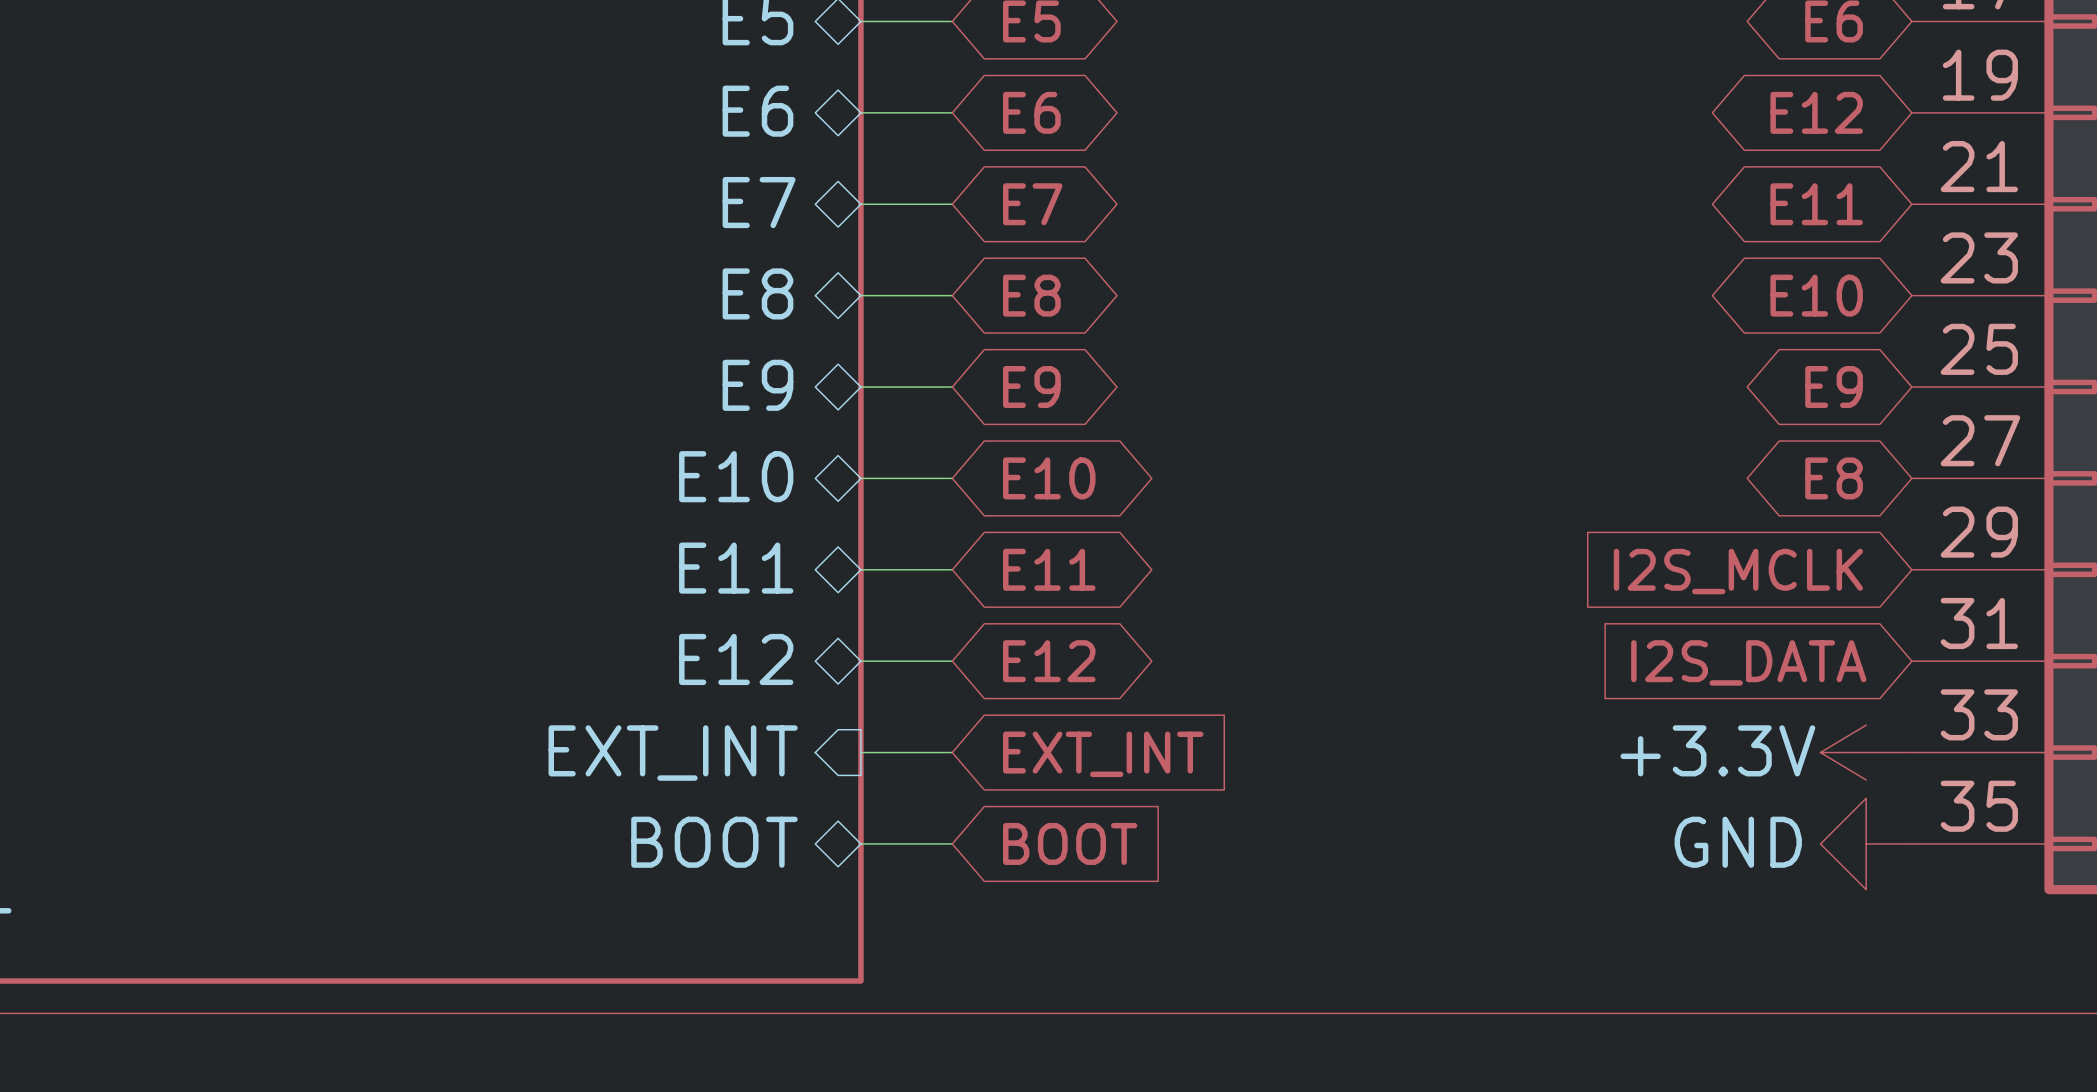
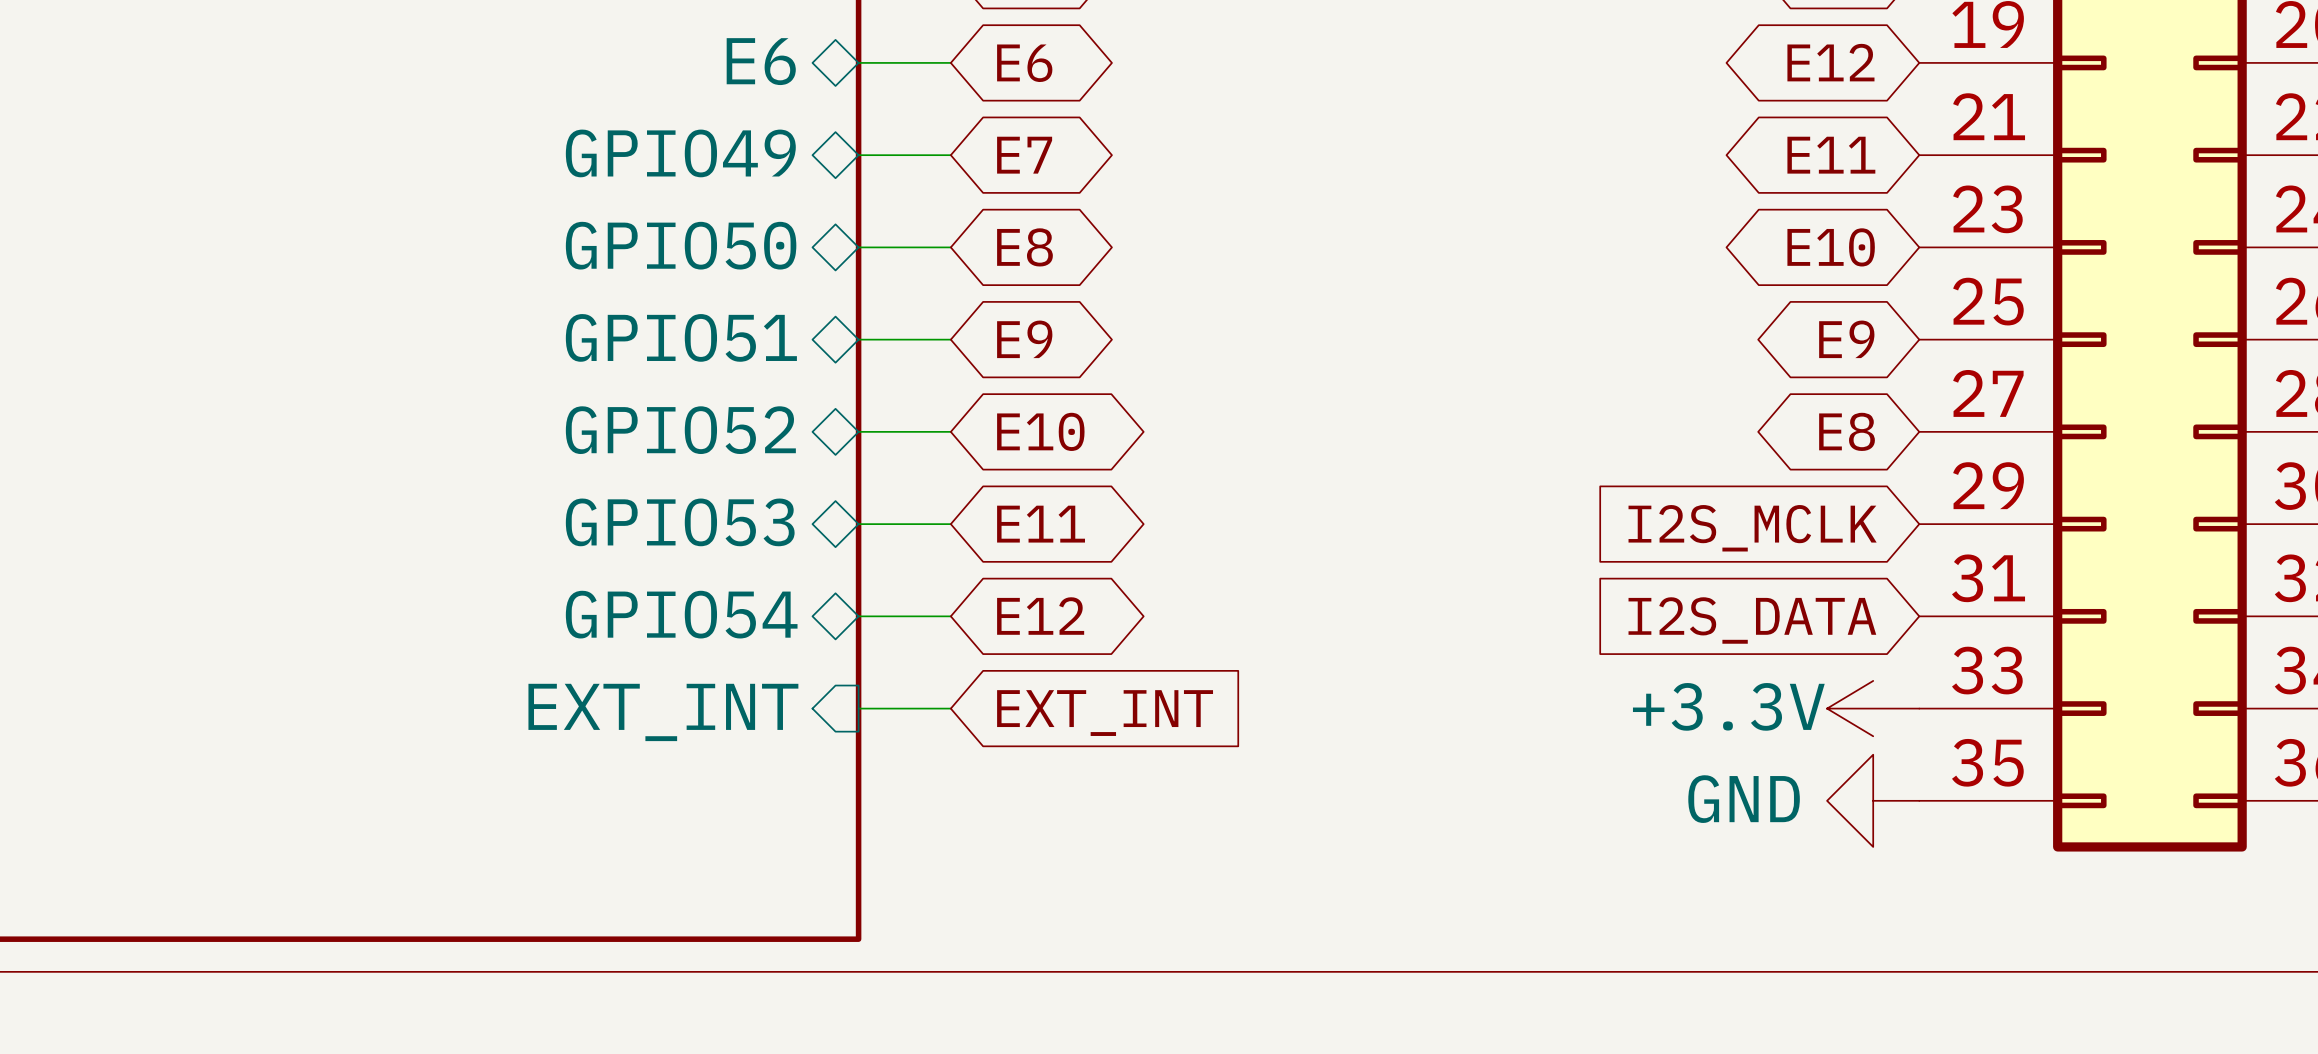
sheet pin: E7 (759, 202) -> GPIO49 (680, 153)
sheet pin: E8 (757, 293) -> GPIO50 (681, 245)
sheet pin: E9 (757, 385) -> GPIO51 (681, 337)
sheet pin: E10 (736, 476) -> GPIO52 (680, 430)
sheet pin: E11 (736, 568) -> GPIO53 (680, 522)
sheet pin: E12 (736, 659) -> GPIO54 (681, 614)
sheet pin: BOOT (714, 842) -> none
wire: (860, 843) (952, 843) -> none
global label: BOOT (1070, 843) -> none

